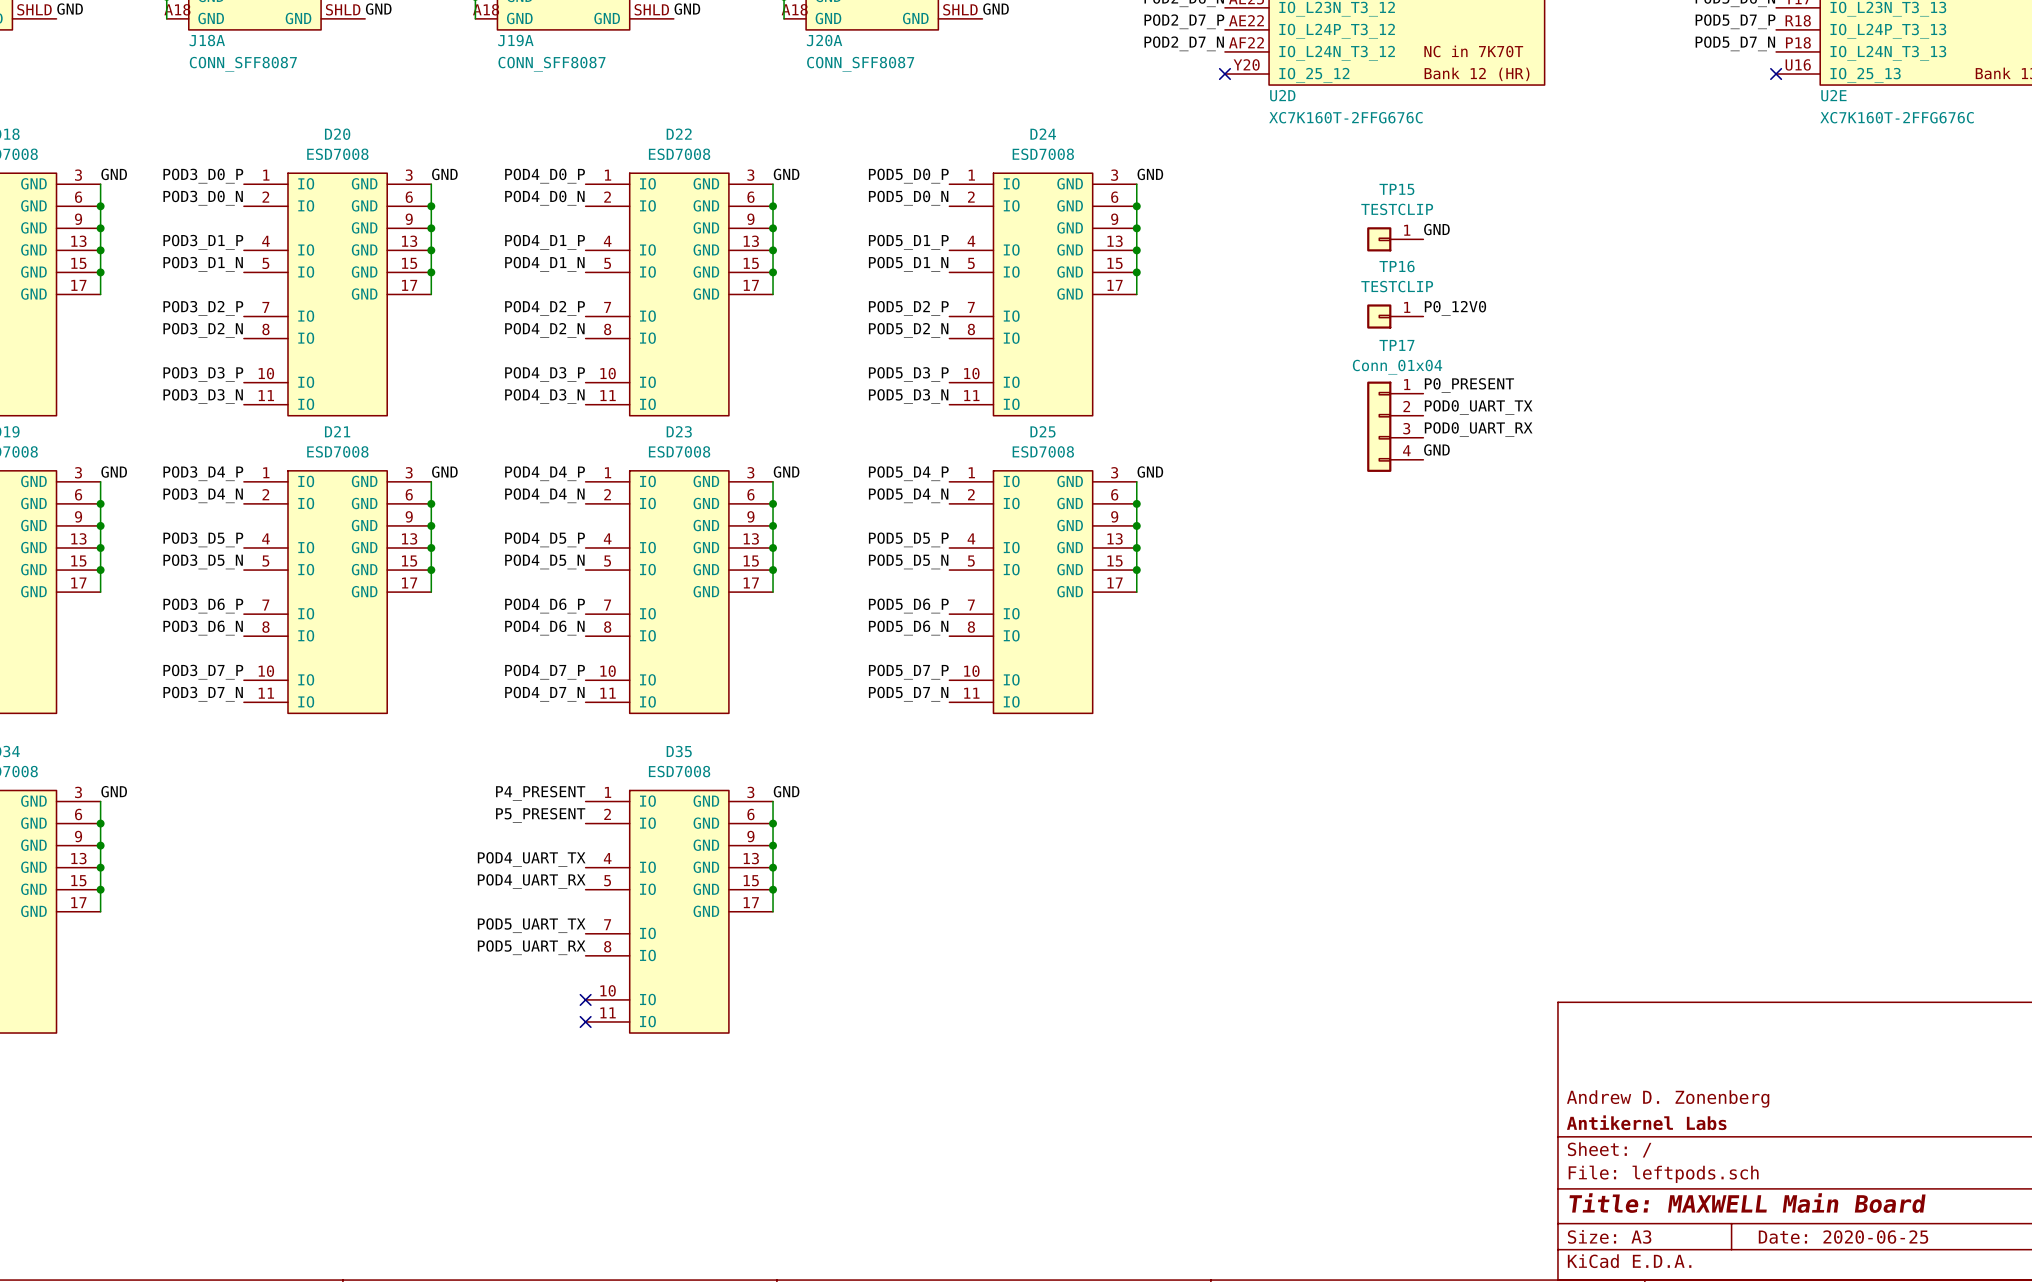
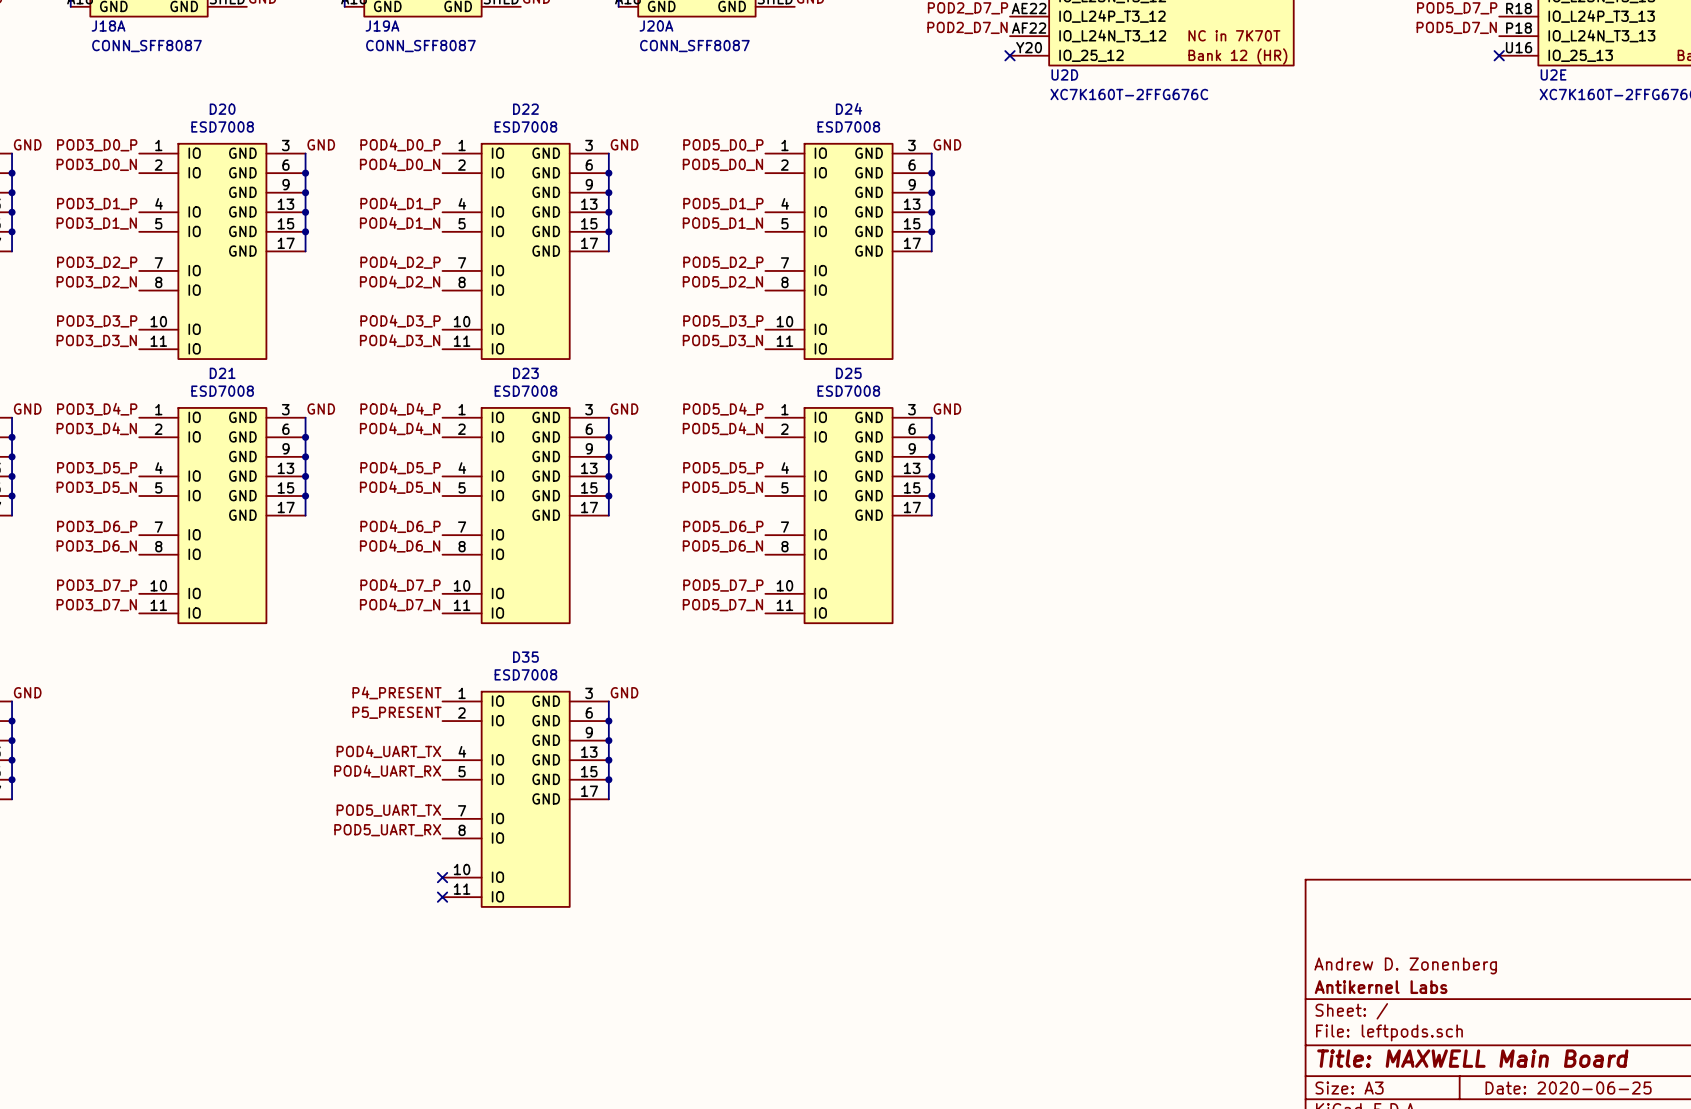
label: GND (1436, 229) -> none
TP15: TESTCLIP (1395, 239) -> none
label: P0_12V0 (1455, 308) -> none
TP16: TESTCLIP (1395, 316) -> none
label: P0_PRESENT (1469, 385) -> none
label: POD0_UART_TX (1478, 407) -> none
TP17: Conn_01x04 (1395, 426) -> none
label: POD0_UART_RX (1478, 429) -> none
label: GND (1436, 449) -> none

